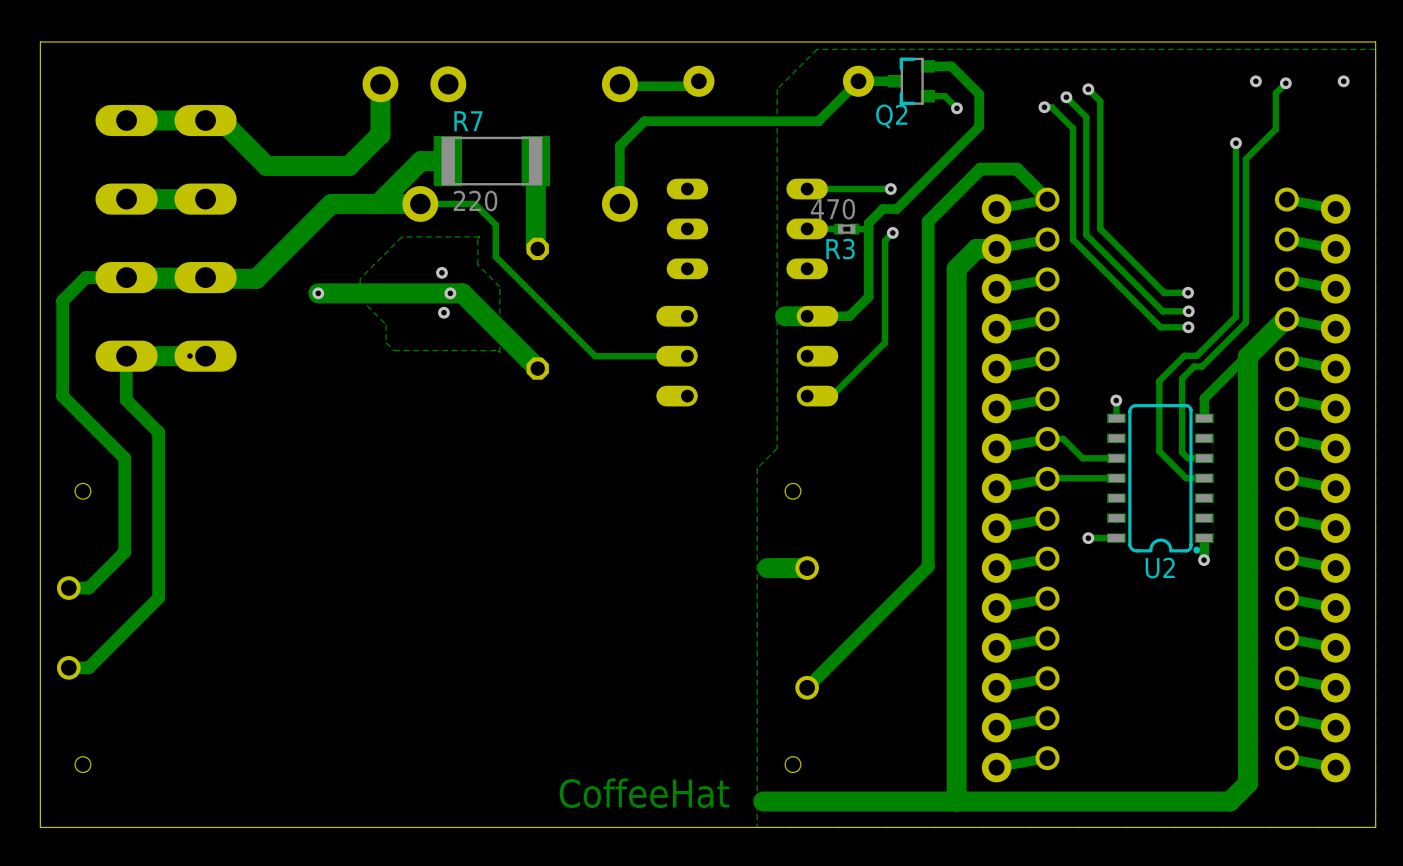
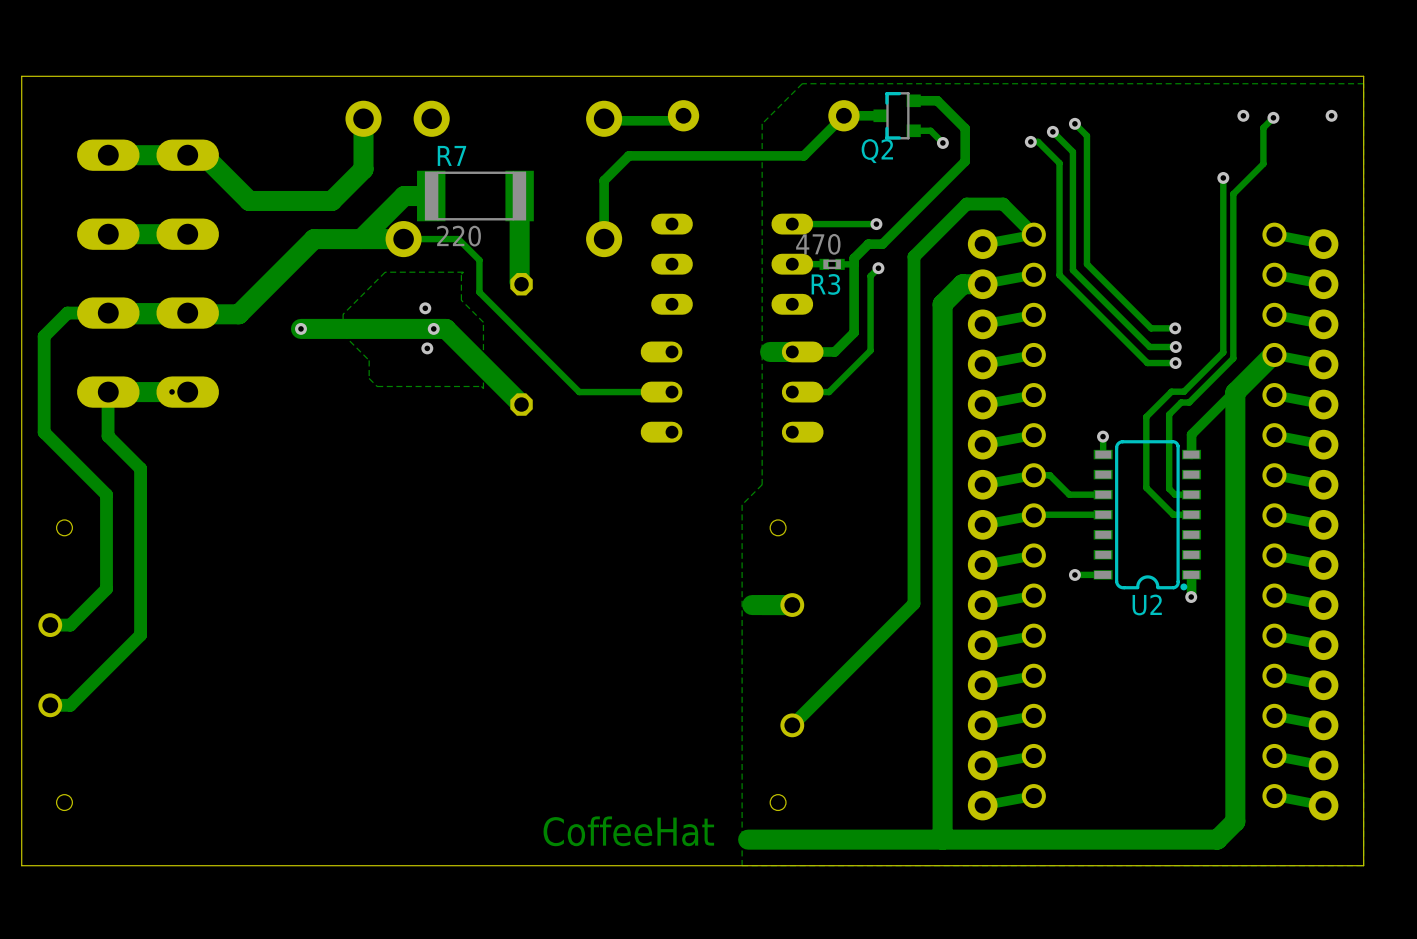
track: (884, 314) (884, 342) (831, 396) (807, 396) -> (870, 350) (829, 392) (792, 392)

